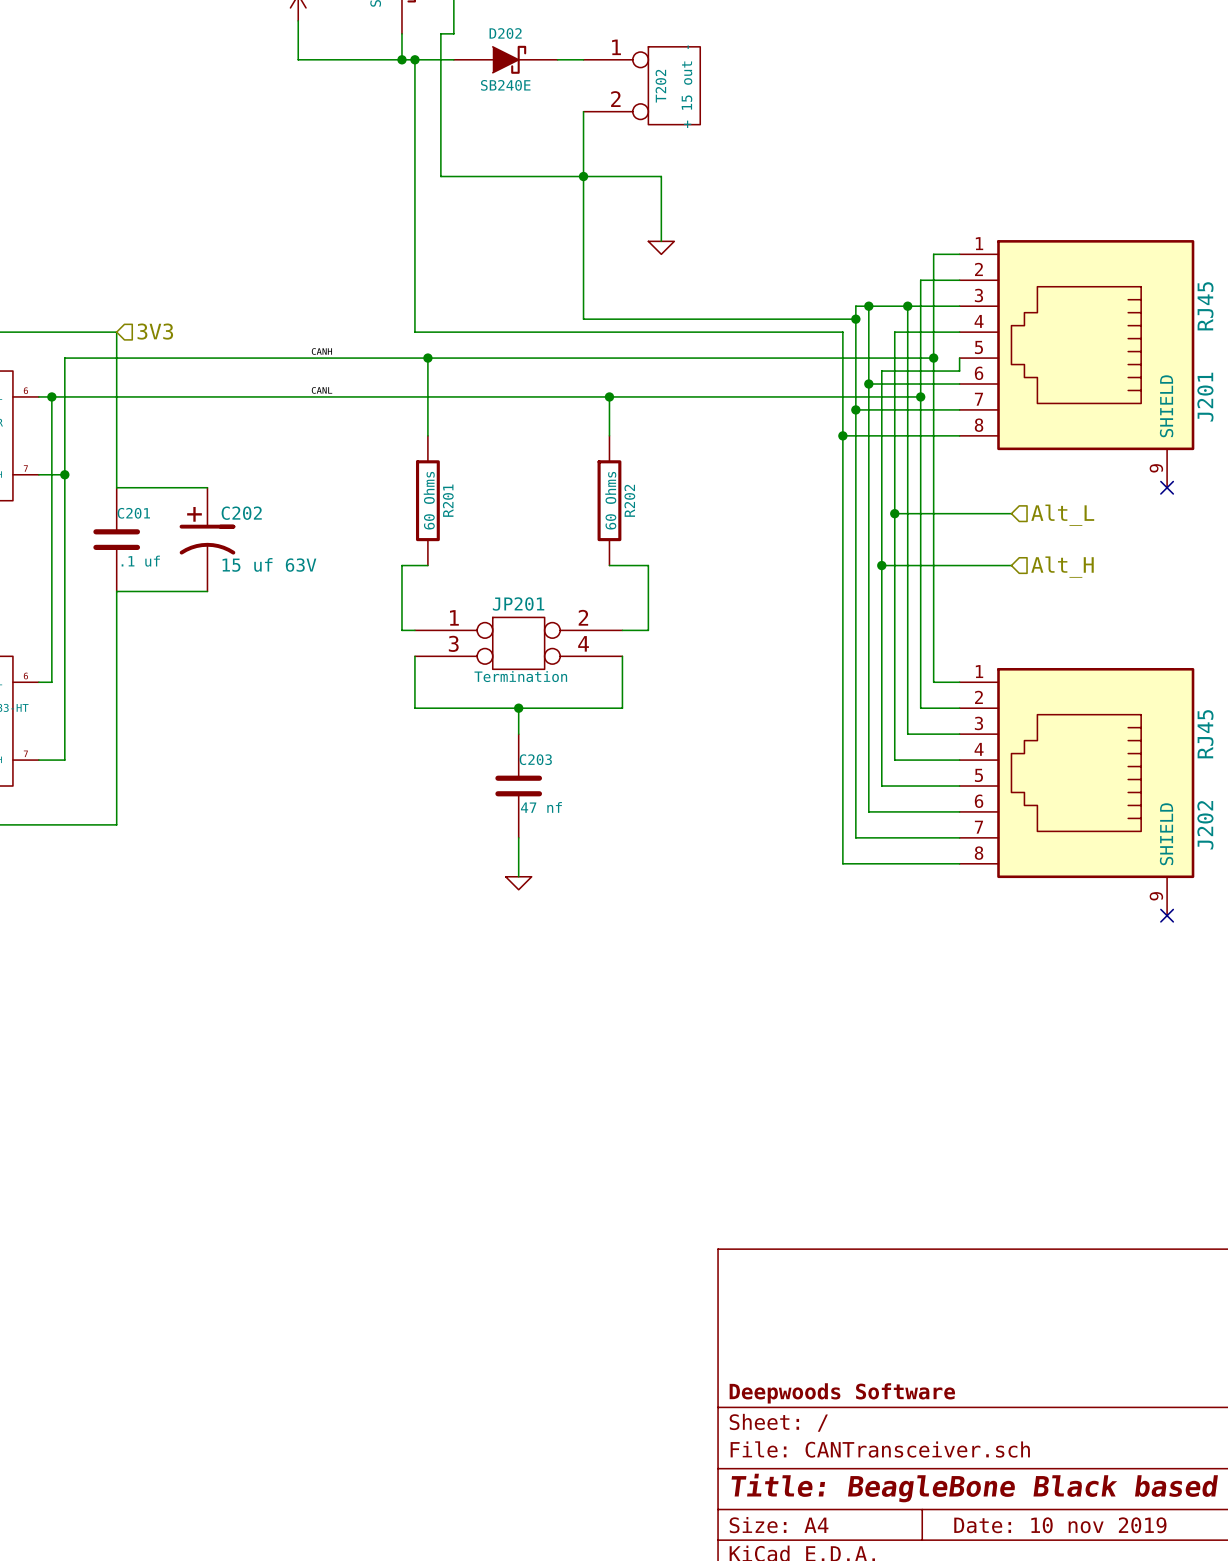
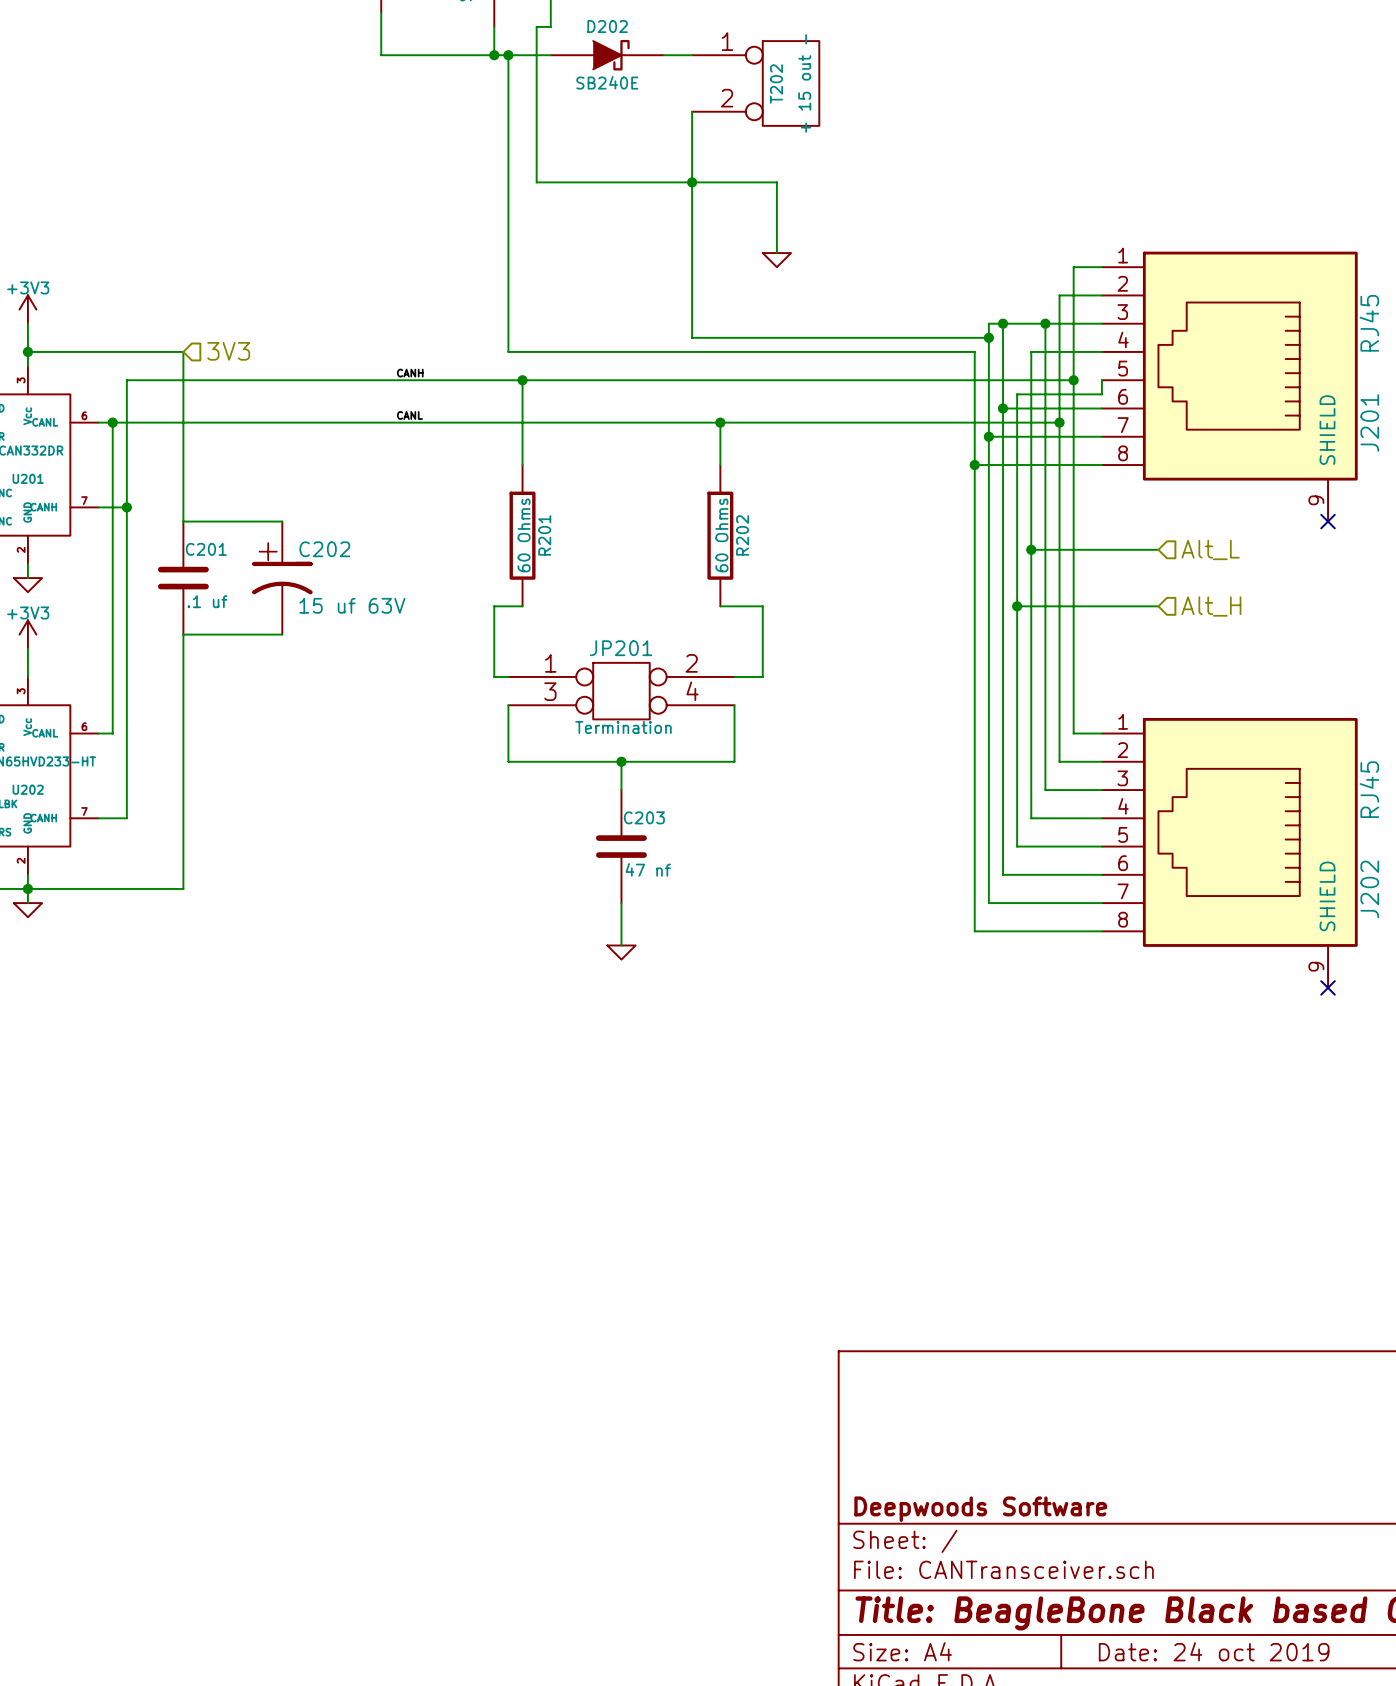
title block: Date: 10 nov 2019 (1060, 1525) -> Date: 24 oct 2019 (1214, 1651)

